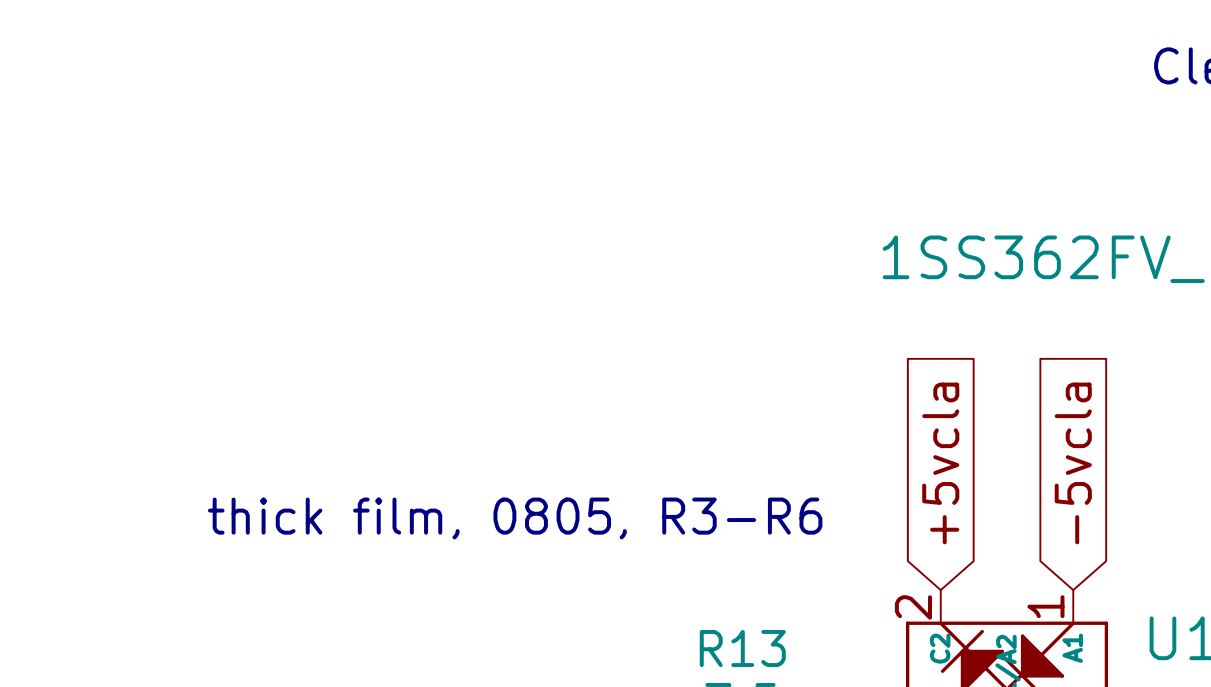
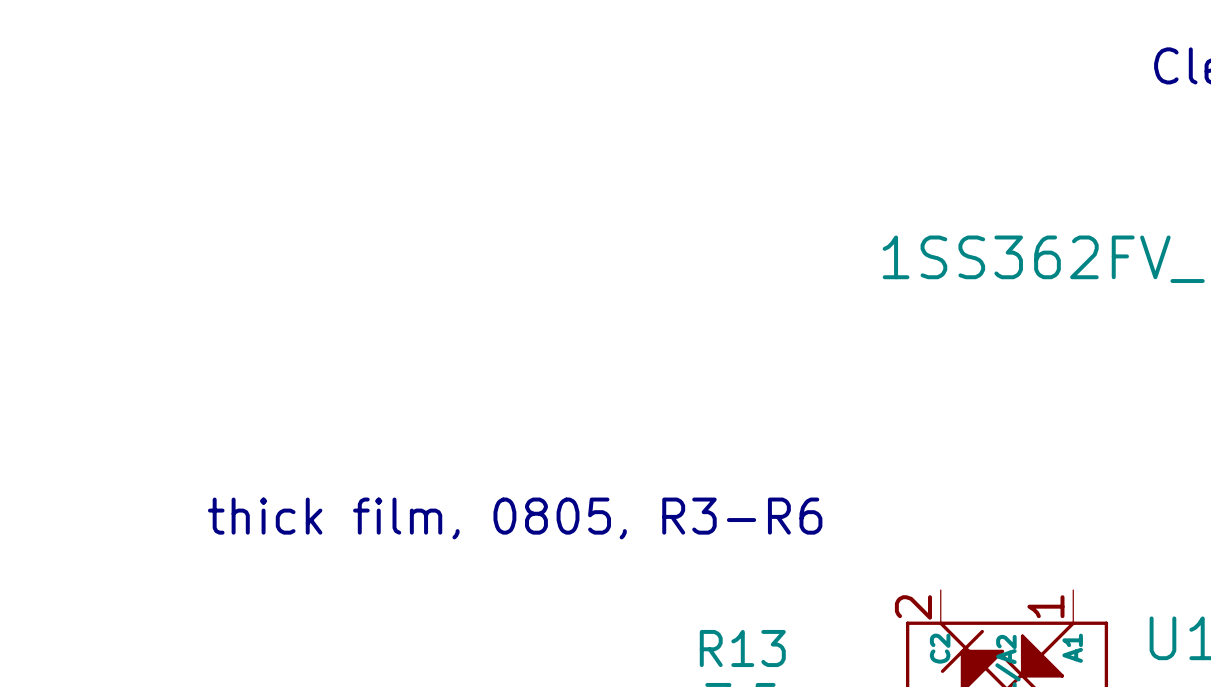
global label: +5vcla (940, 463) -> none
global label: -5vcla (1073, 463) -> none

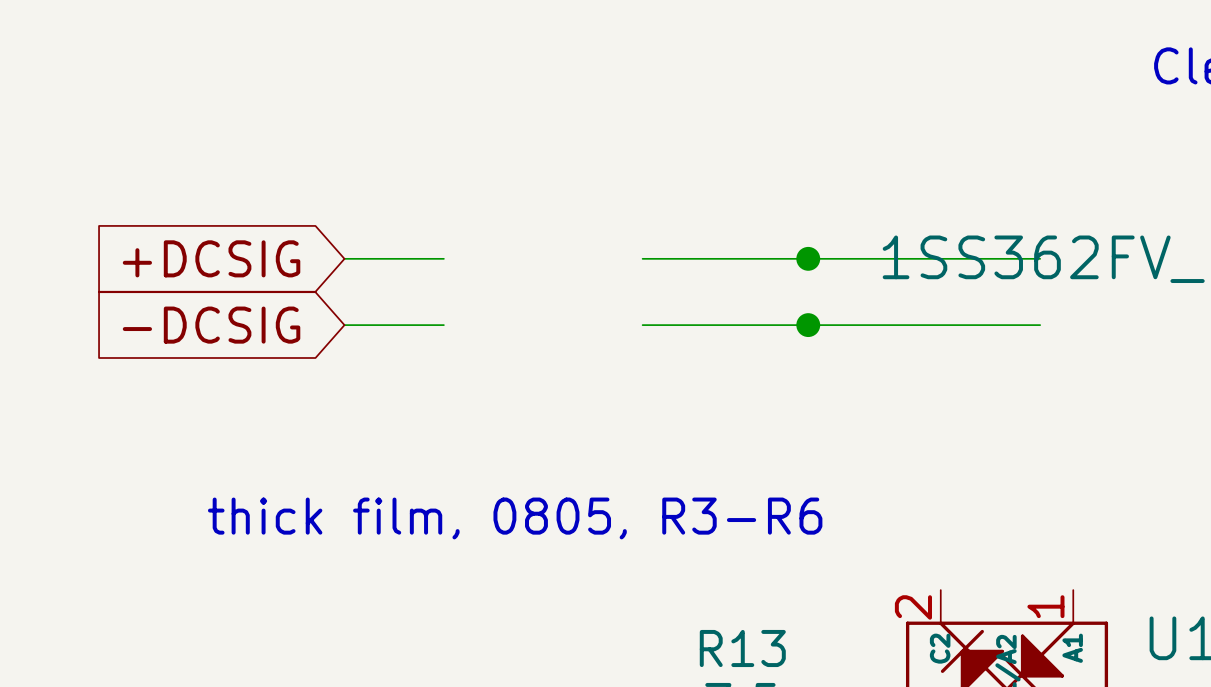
global label: none -> +DCSIG (211, 258)
wire: none -> (344, 258) (443, 258)
wire: none -> (642, 258) (1040, 258)
junction: none -> (808, 258)
global label: none -> -DCSIG (211, 325)
wire: none -> (344, 325) (443, 325)
wire: none -> (642, 325) (1040, 325)
junction: none -> (808, 325)

